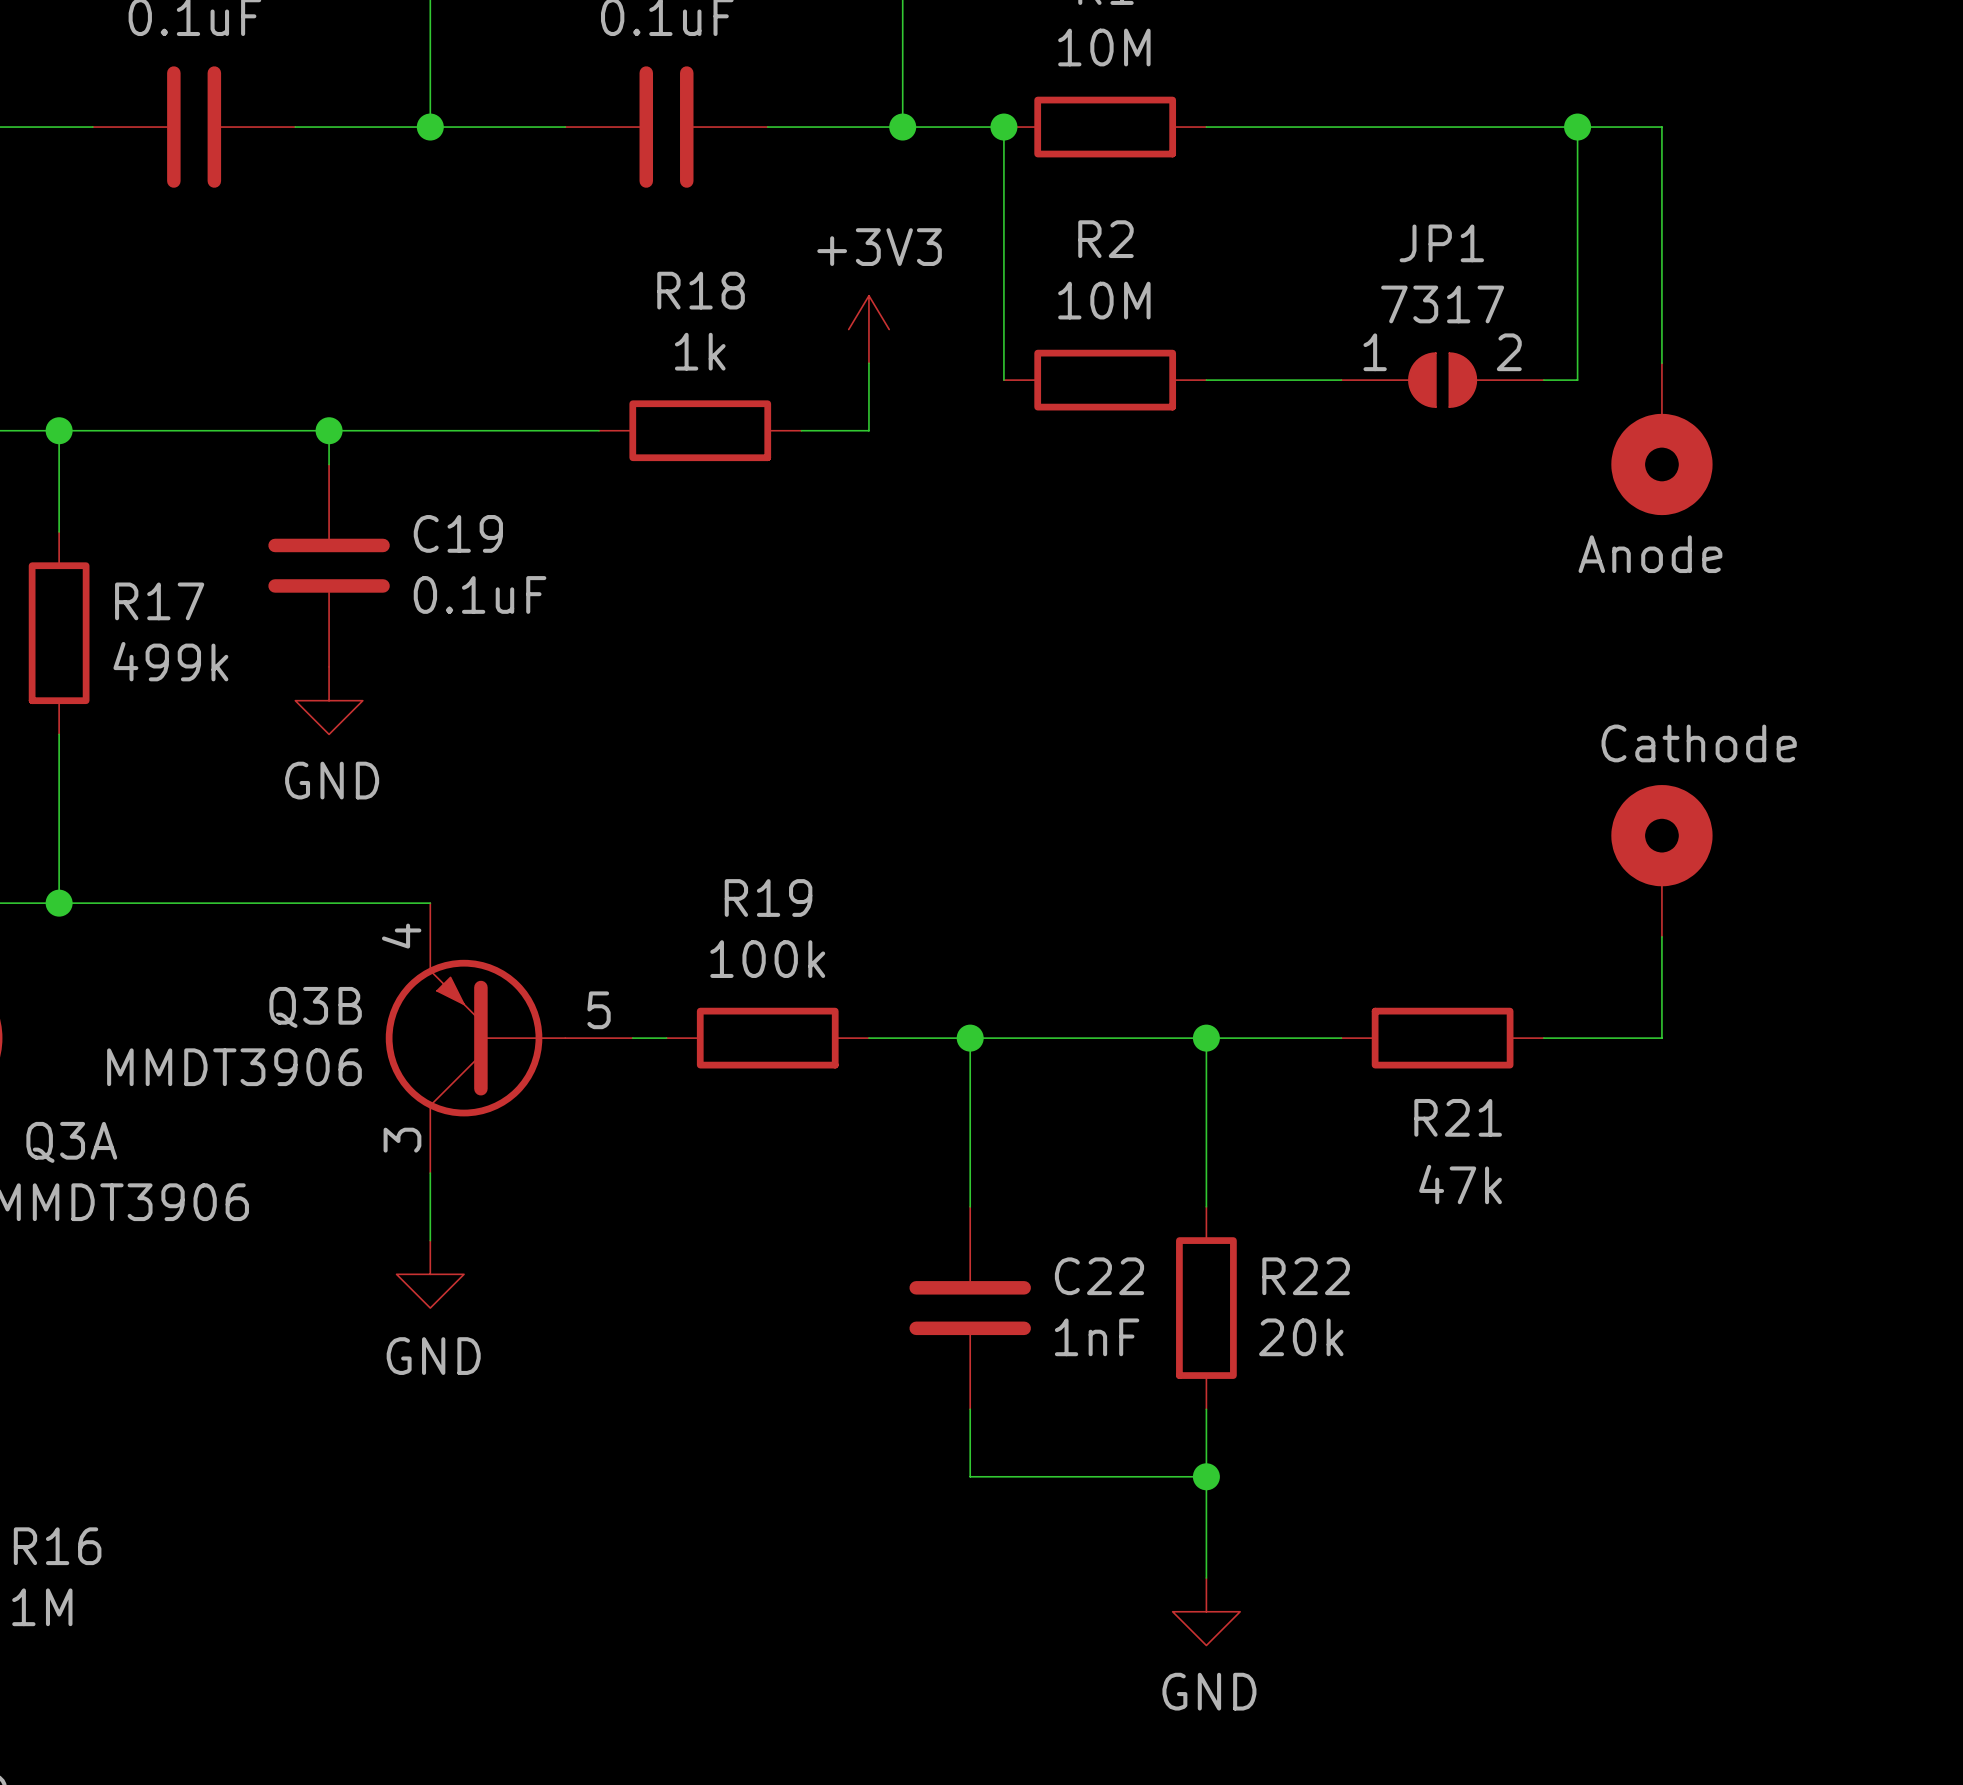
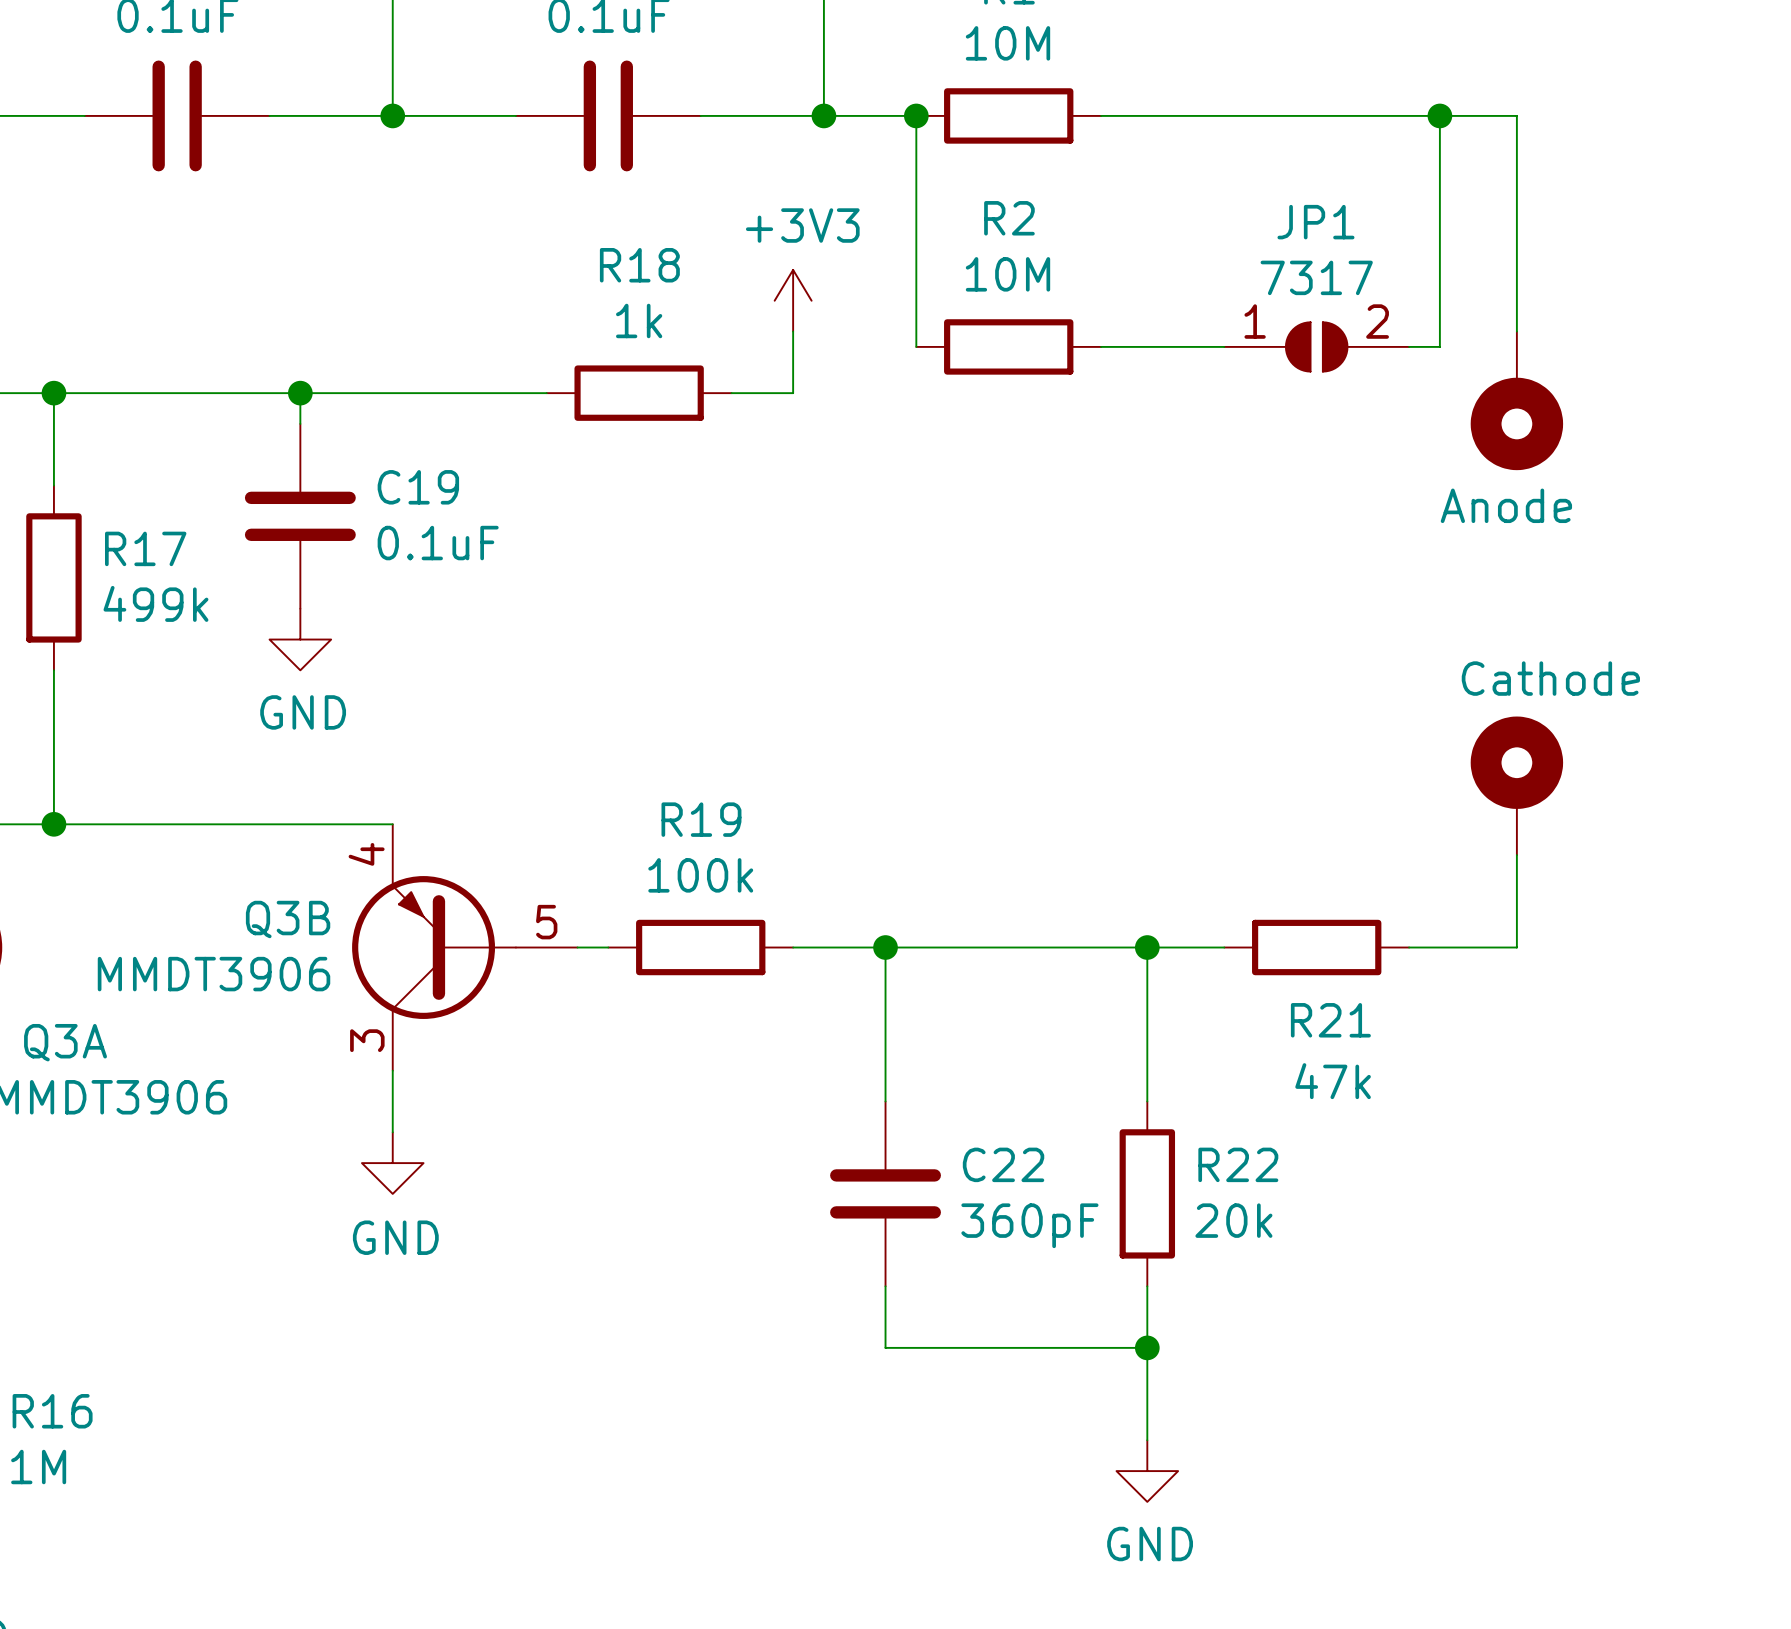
wire: (1206, 1038) (1206, 1206) -> (1147, 947) (1147, 1101)
junction position: (1206, 1038) -> (1147, 947)
R22 position: (1206, 1308) -> (1147, 1193)
C22 value: 1nF (1097, 1337) -> 360pF (1029, 1225)
wire: (1206, 1409) (1206, 1578) -> (1147, 1286) (1147, 1440)
wire: none -> (1101, 1347) (1147, 1347)
junction position: (1206, 1476) -> (1147, 1347)
power symbol position: GND (1206, 1611) -> GND (1147, 1471)

